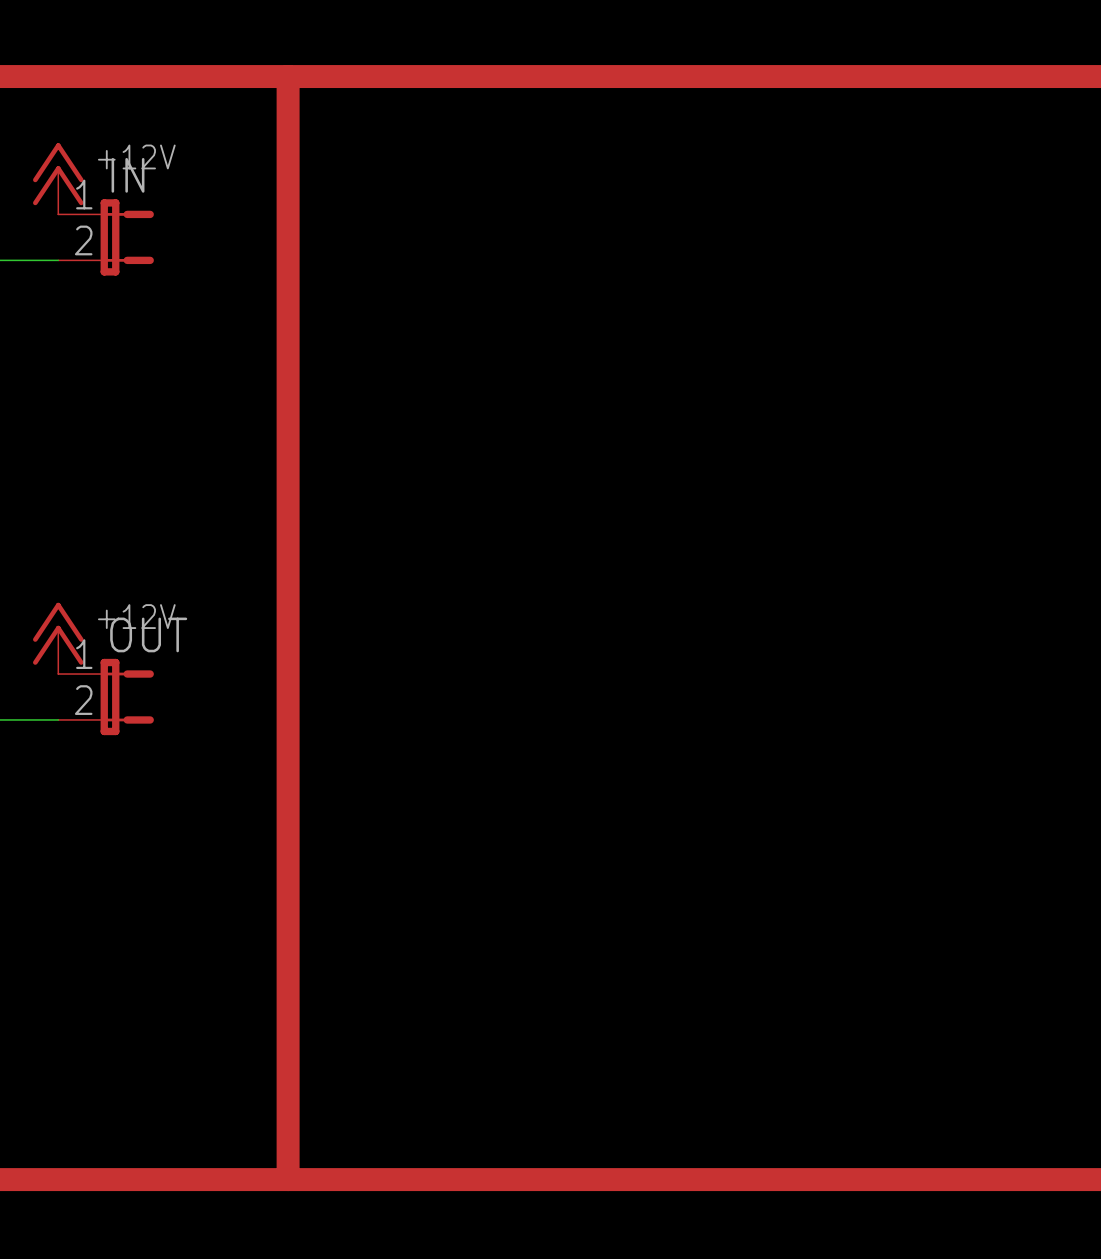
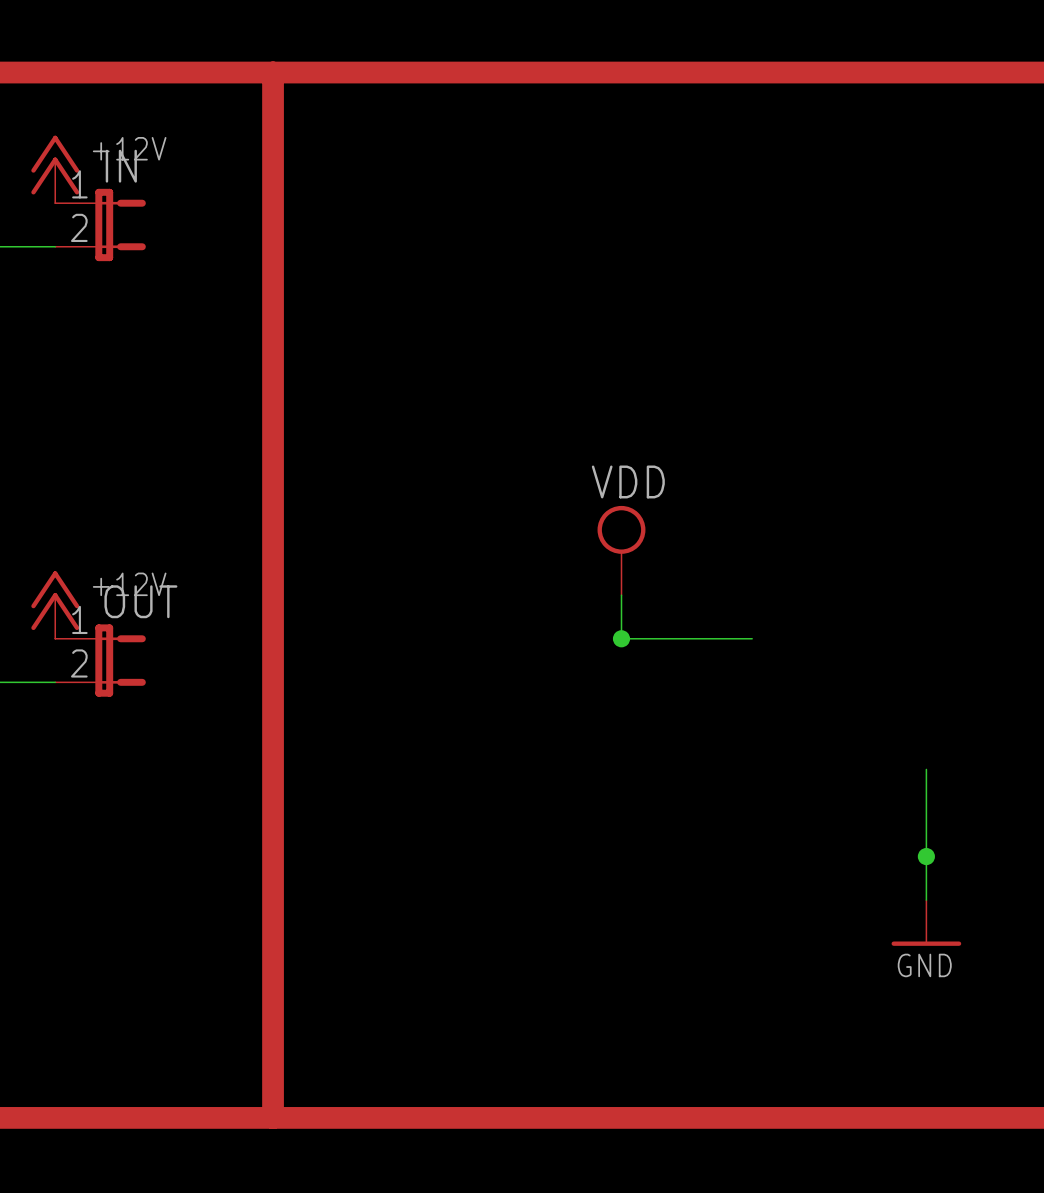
power symbol: none -> VDD (621, 550)
wire: none -> (621, 595) (621, 638) (752, 638)
junction: none -> (621, 638)
wire: none -> (926, 769) (926, 900)
junction: none -> (926, 856)
power symbol: none -> GND (926, 922)

